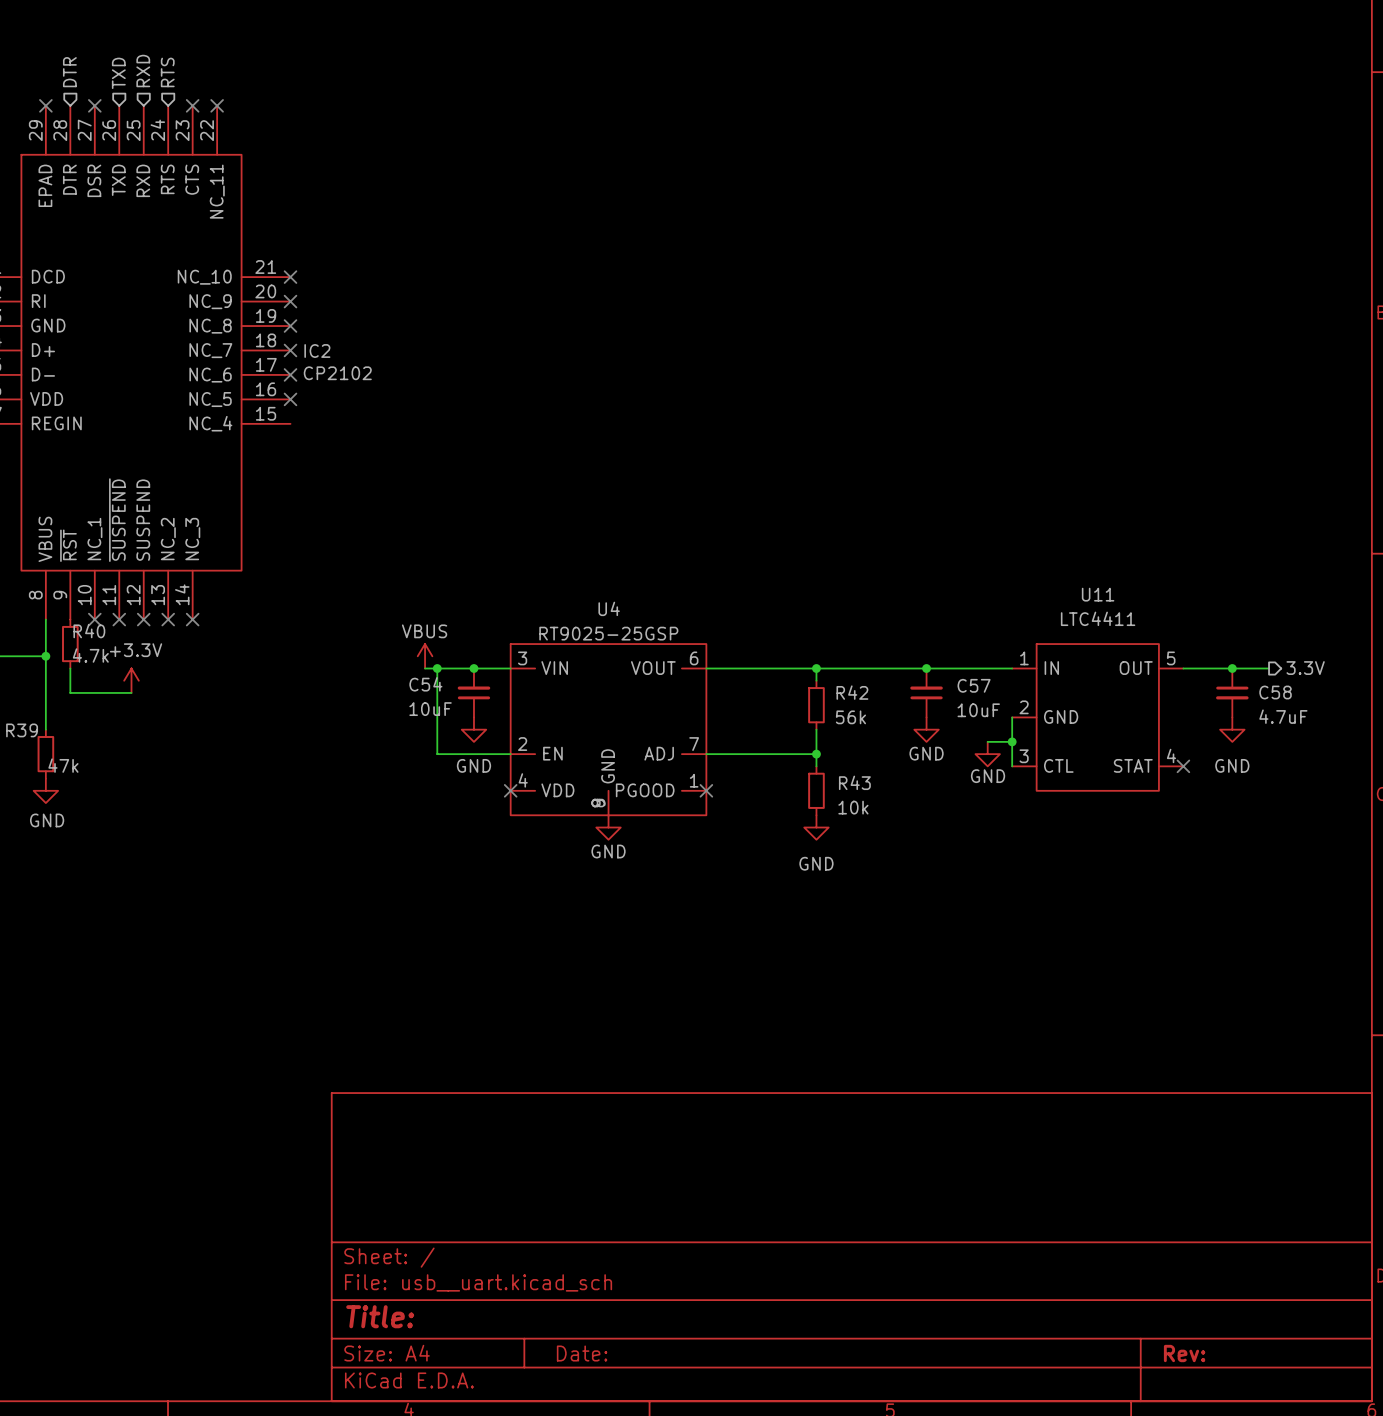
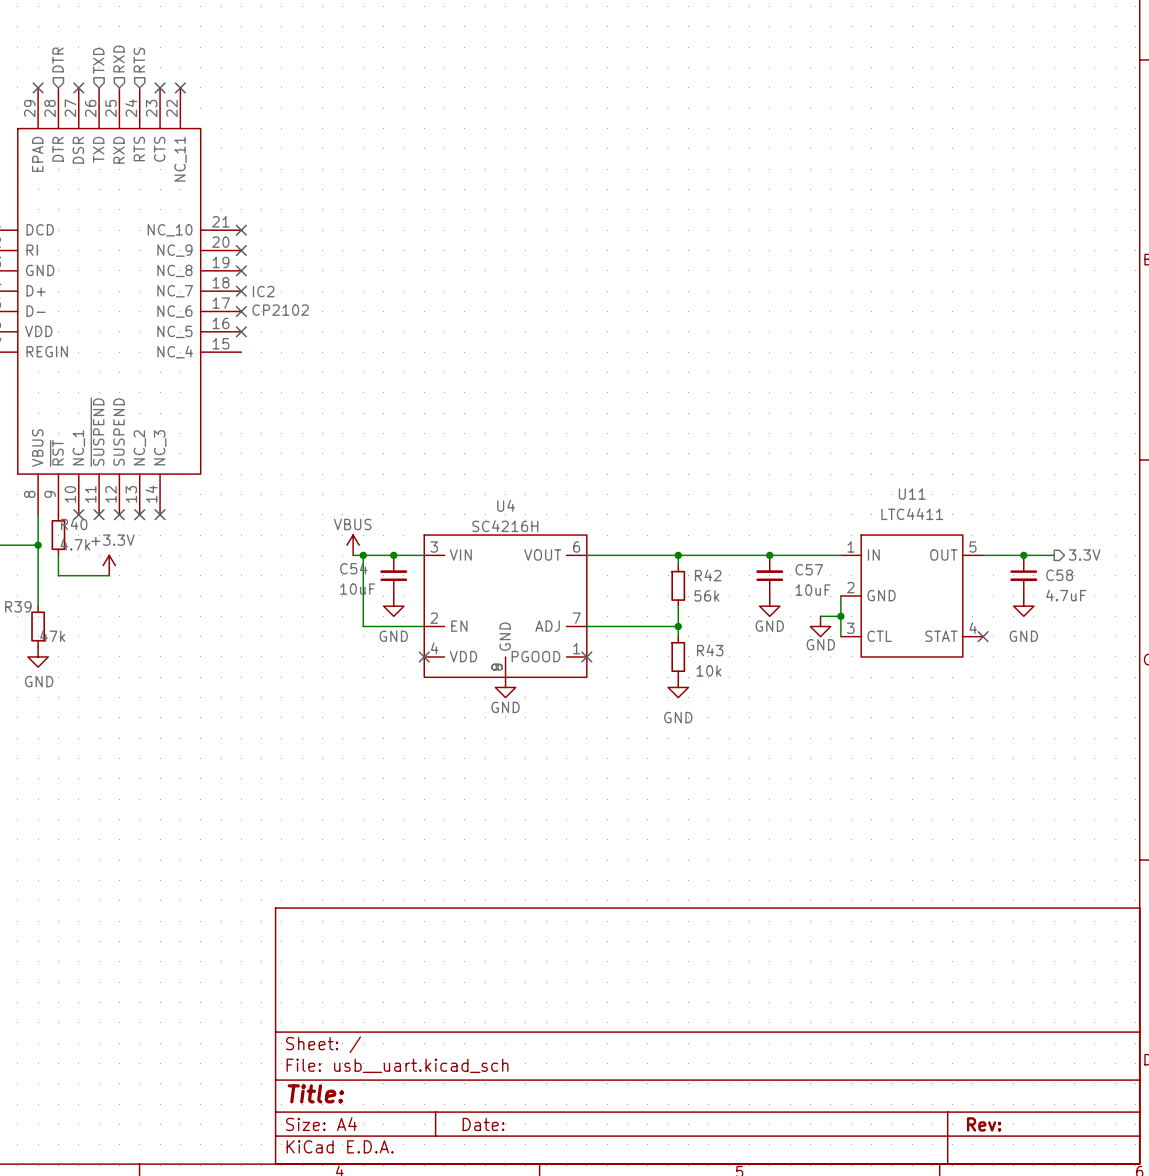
U4 value: RT9025-25GSP (608, 633) -> SC4216H (505, 526)

